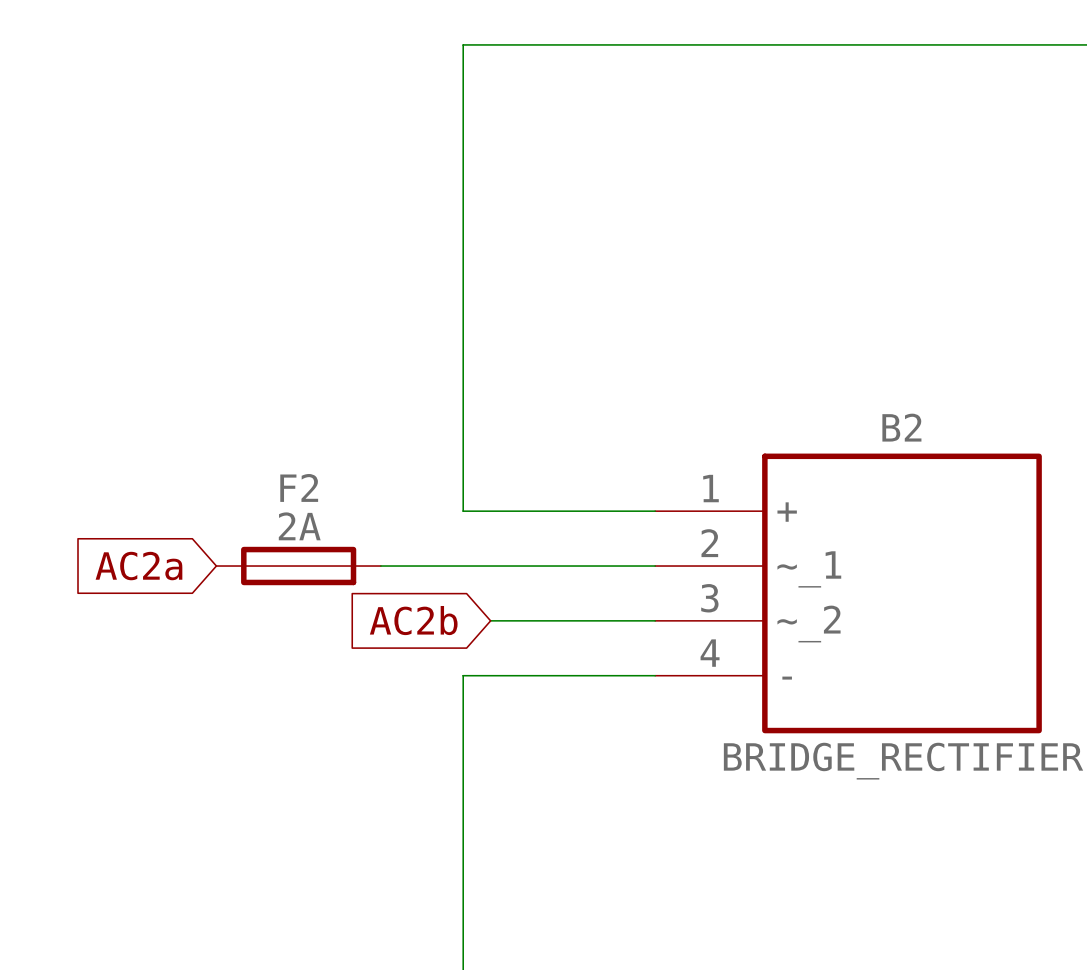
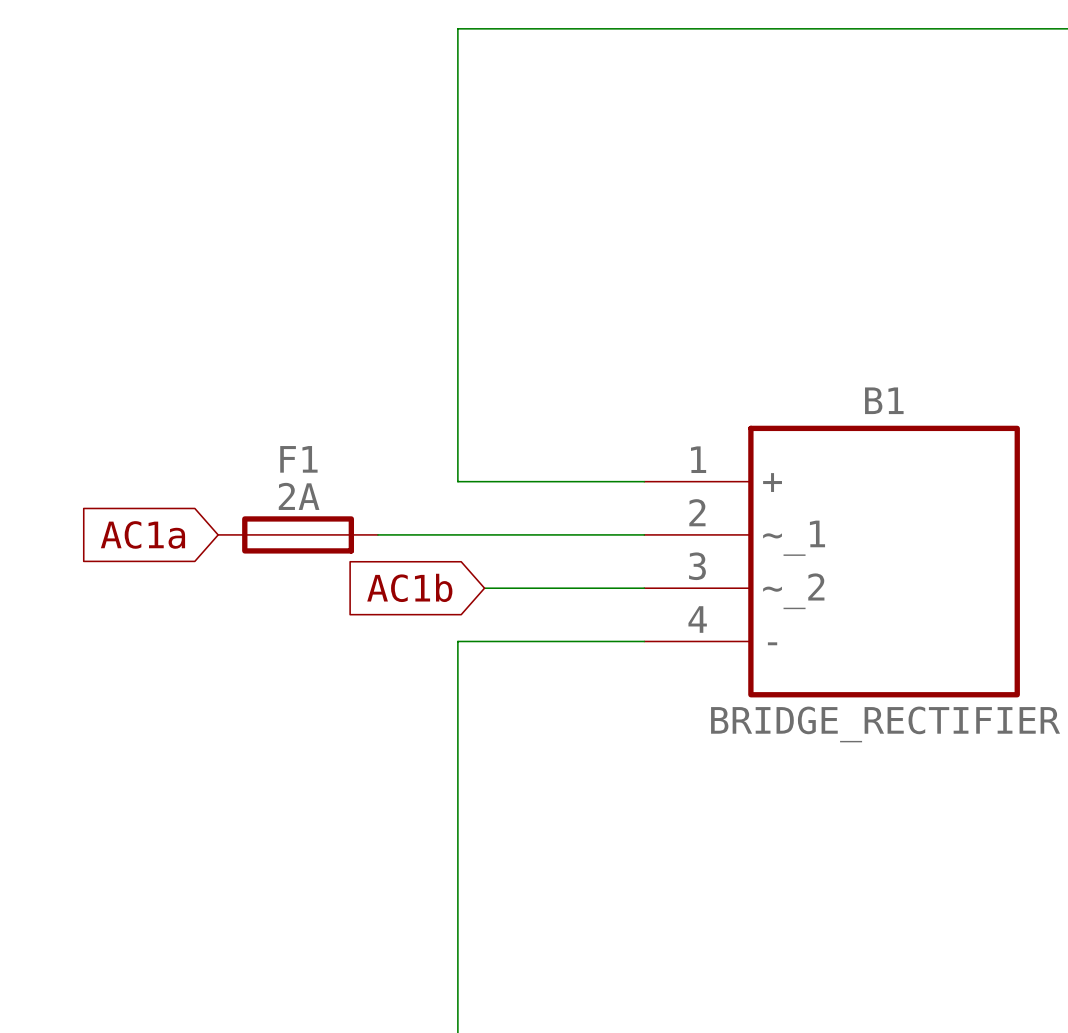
B2 name: B2 (901, 427) -> B1 (884, 400)
F2 name: F2 (299, 487) -> F1 (298, 459)
global label: AC2a (138, 566) -> AC1a (142, 534)
global label: AC2b (413, 620) -> AC1b (409, 587)

